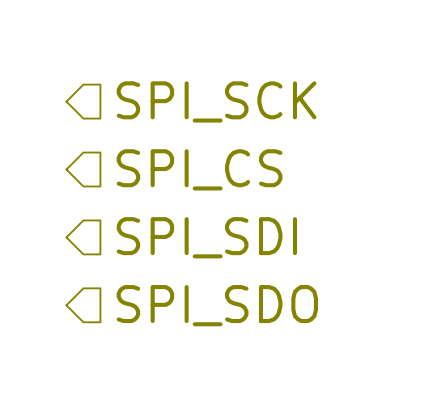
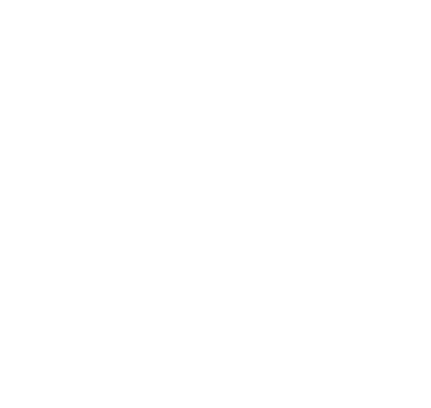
hierarchical label: SPI_SCK (216, 101) -> none
hierarchical label: SPI_CS (199, 169) -> none
hierarchical label: SPI_SDI (206, 237) -> none
hierarchical label: SPI_SDO (217, 305) -> none

